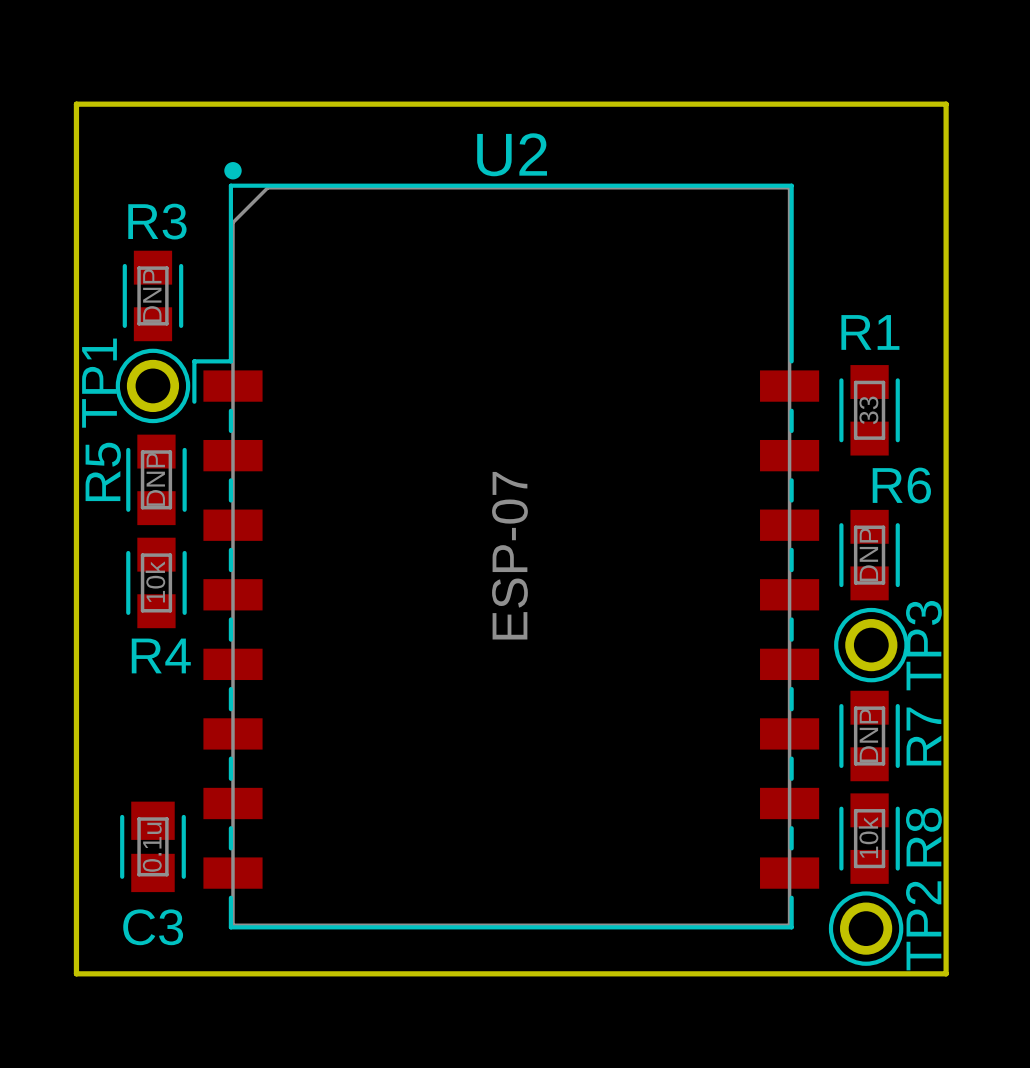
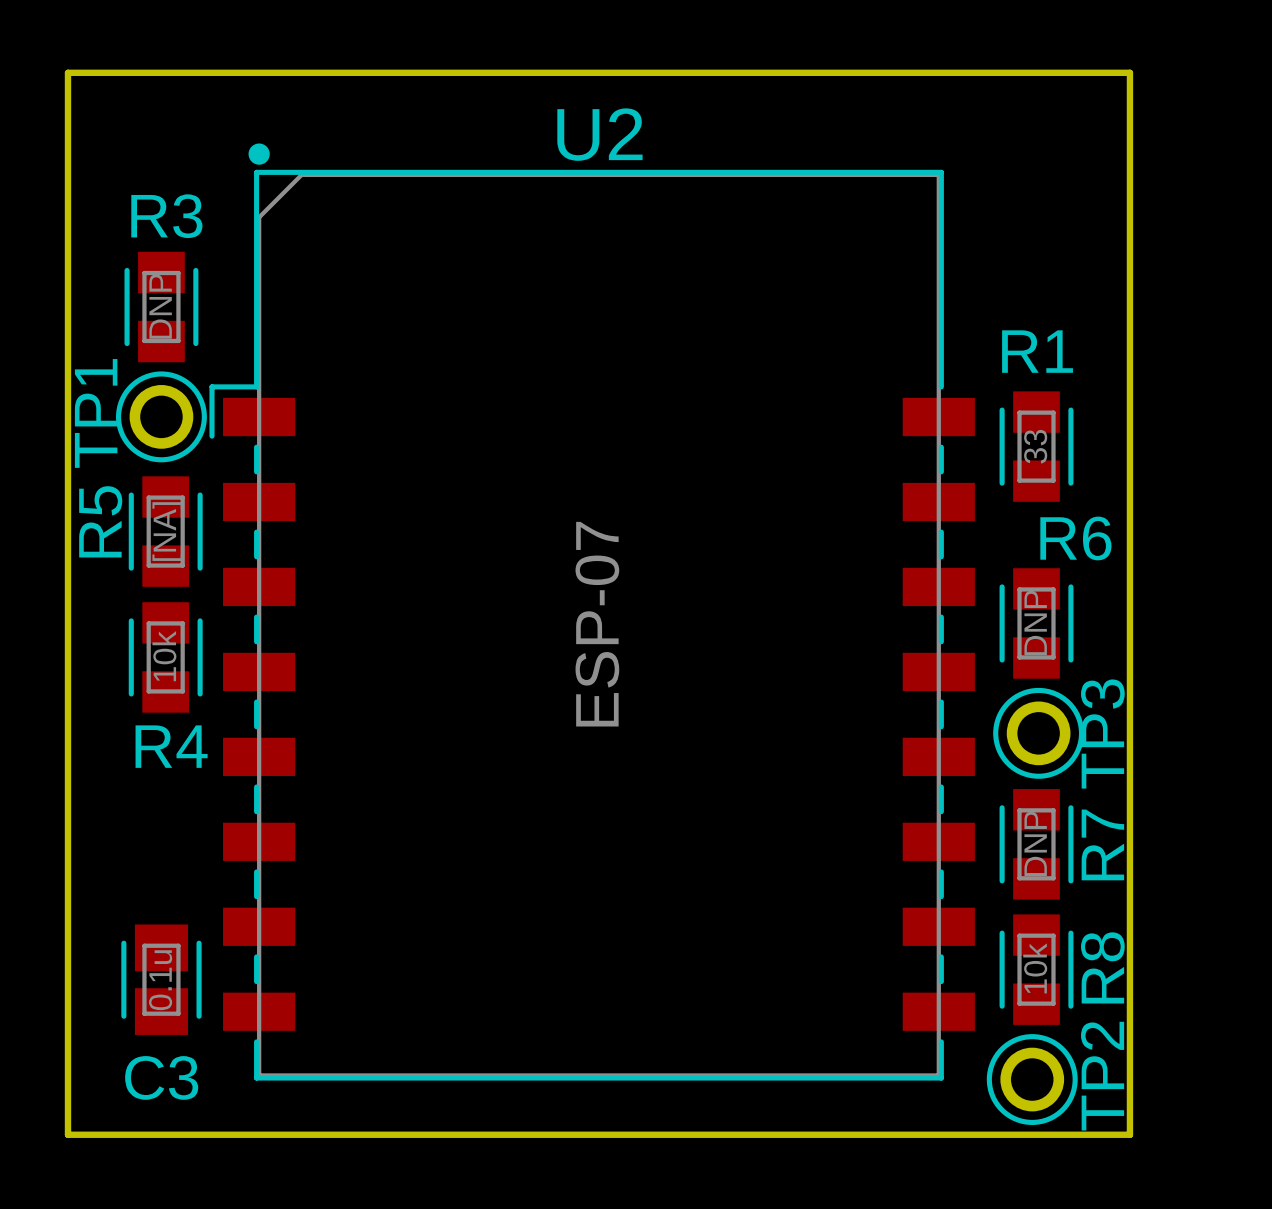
R5 value: DNP (155, 479) -> [NA] (167, 531)

